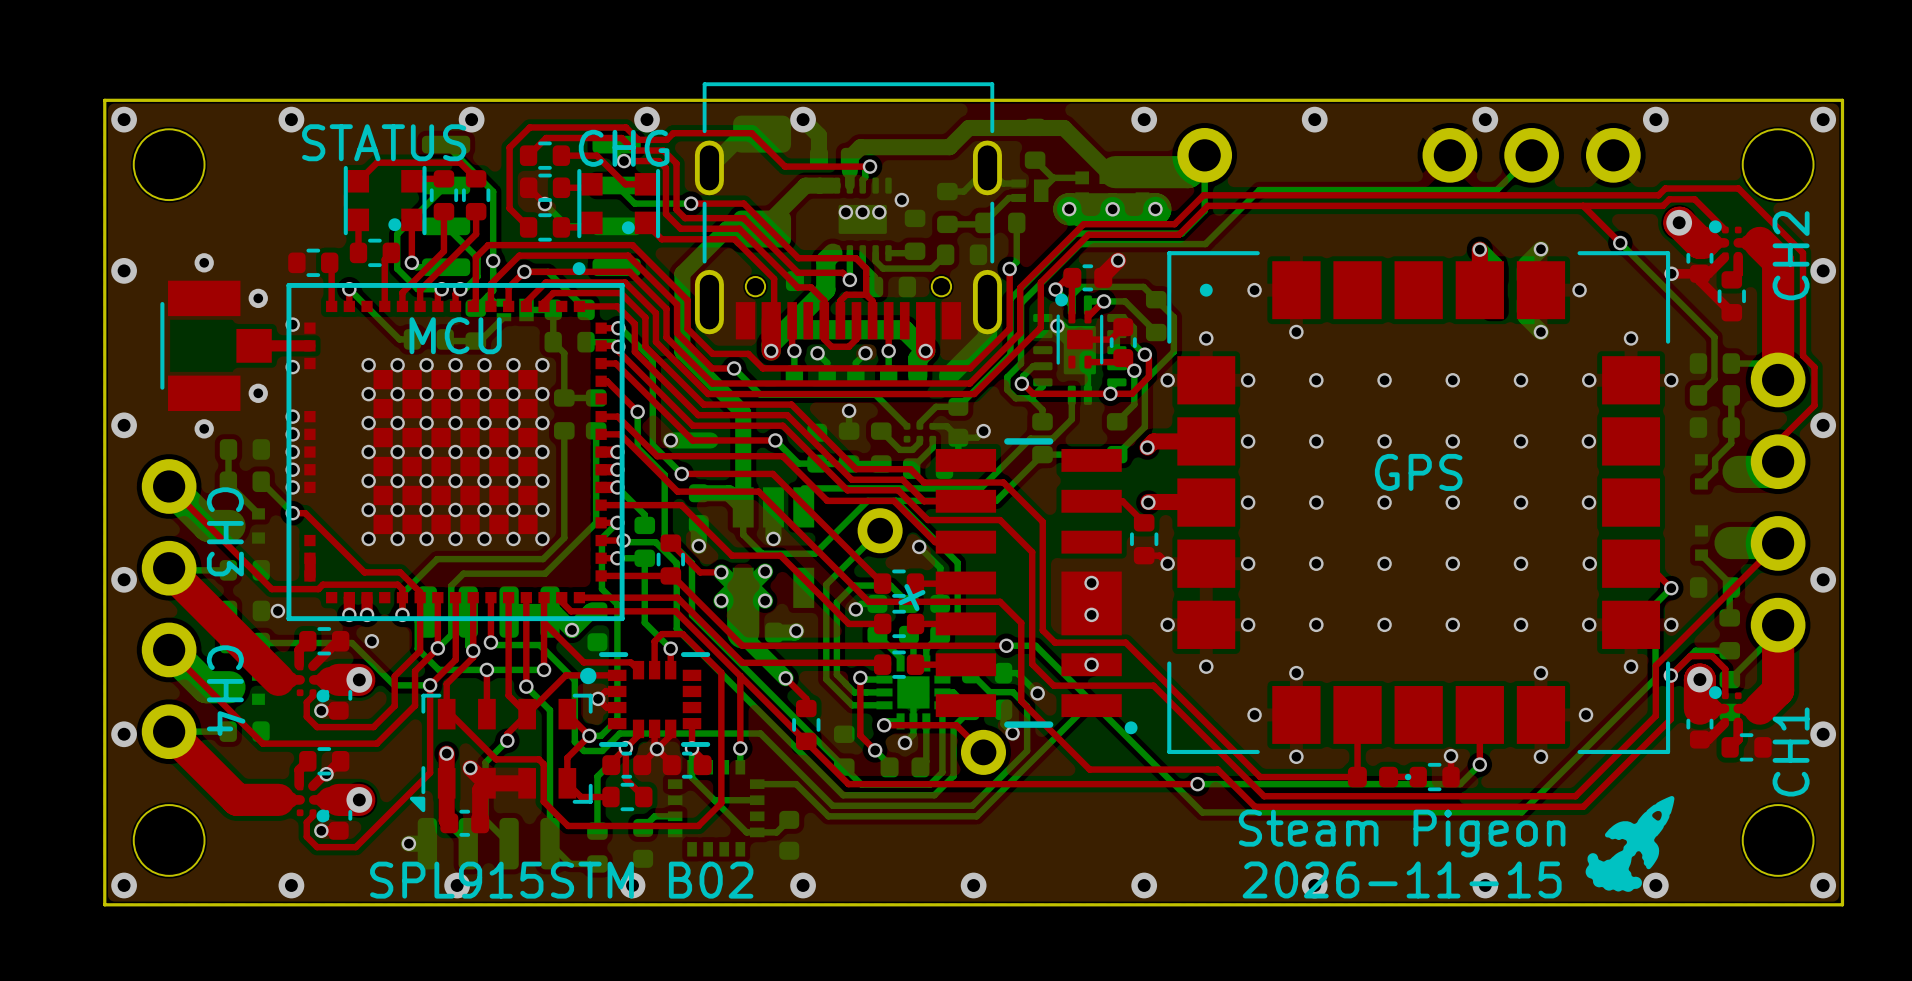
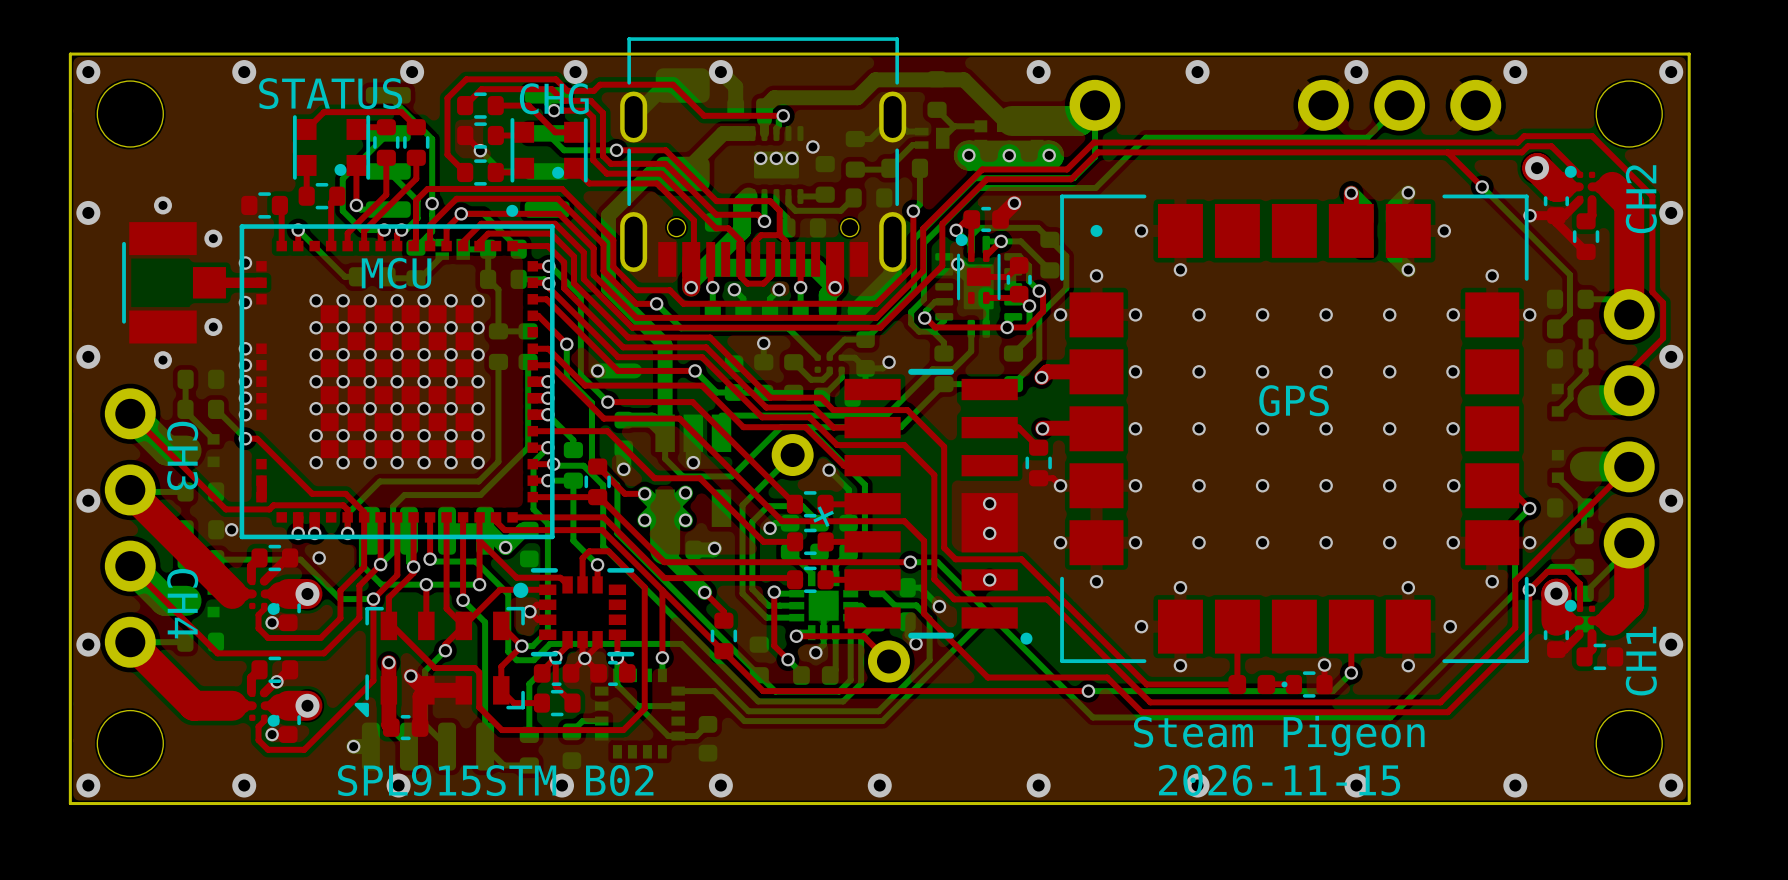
drawing: [1585, 796, 1675, 892] -> none

